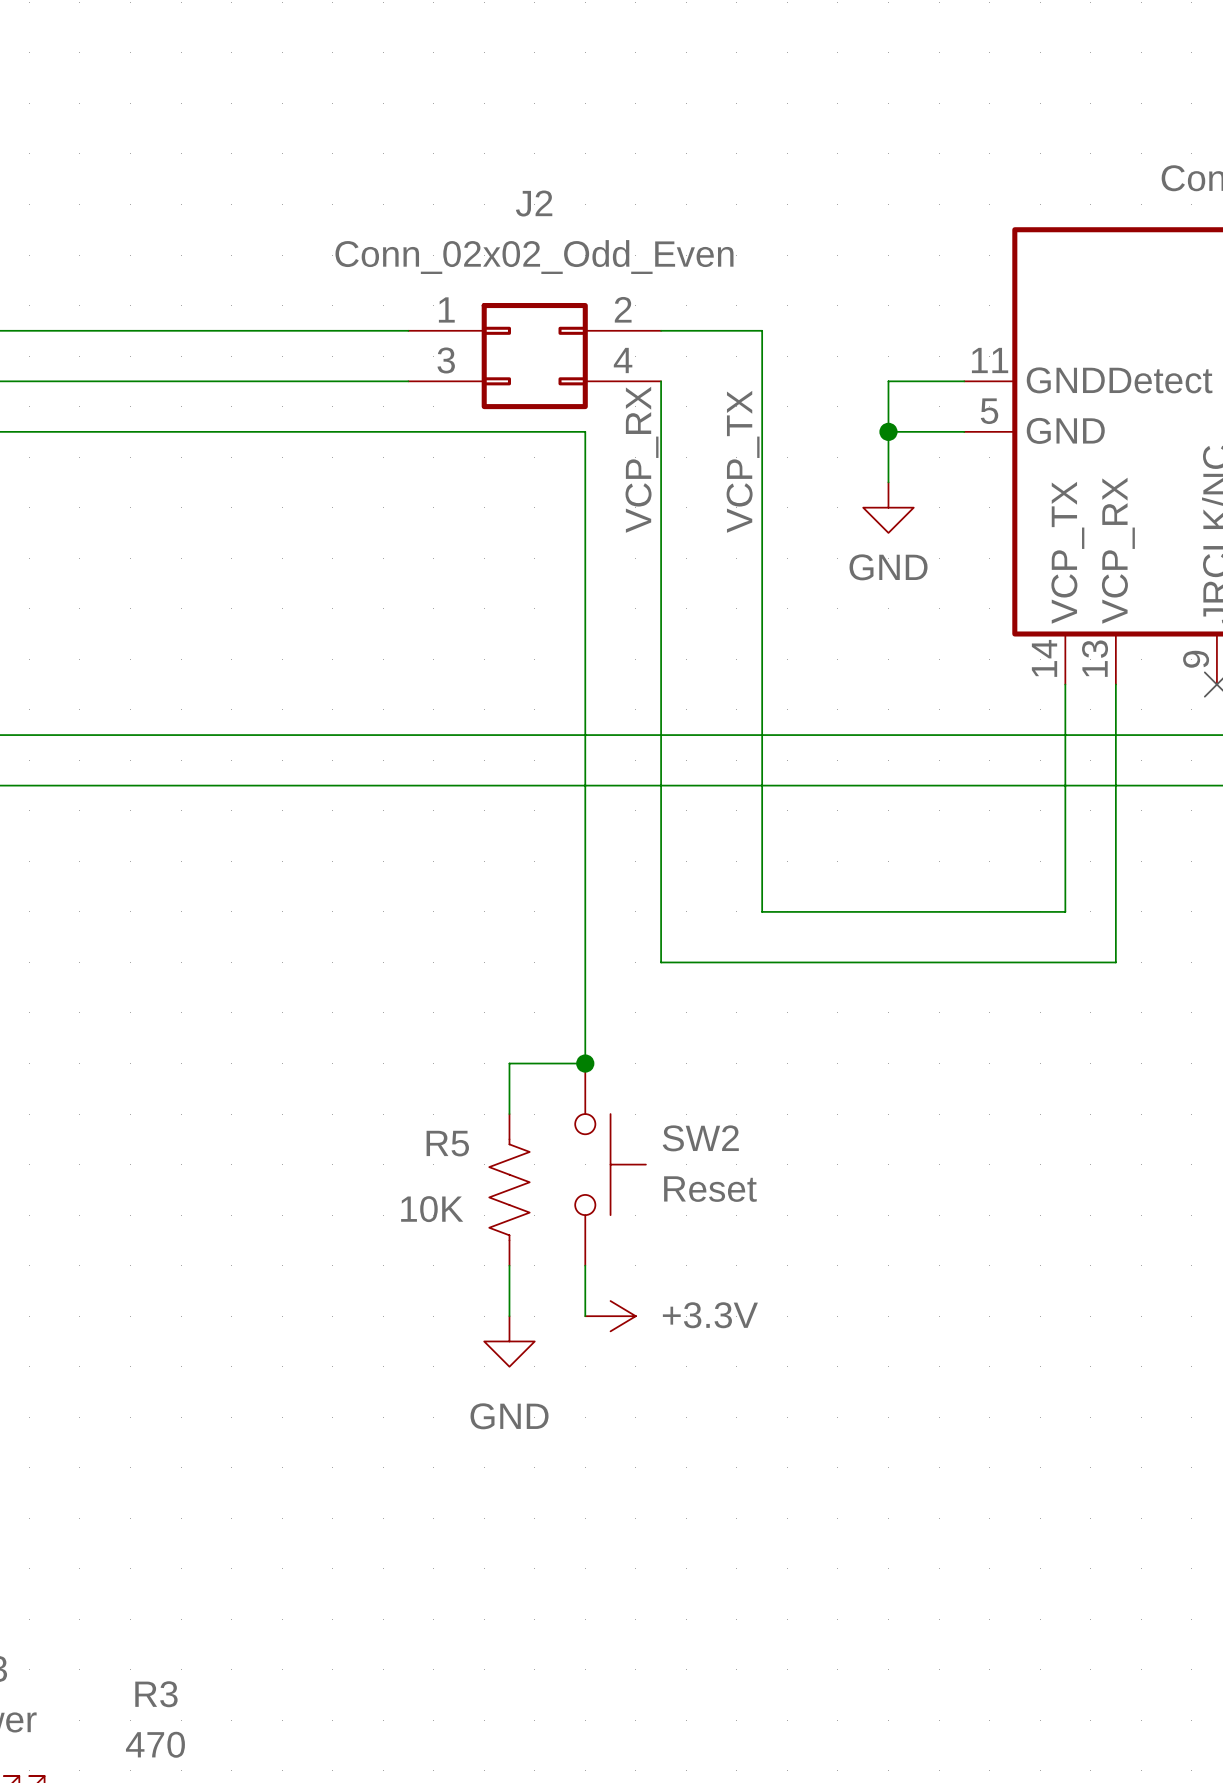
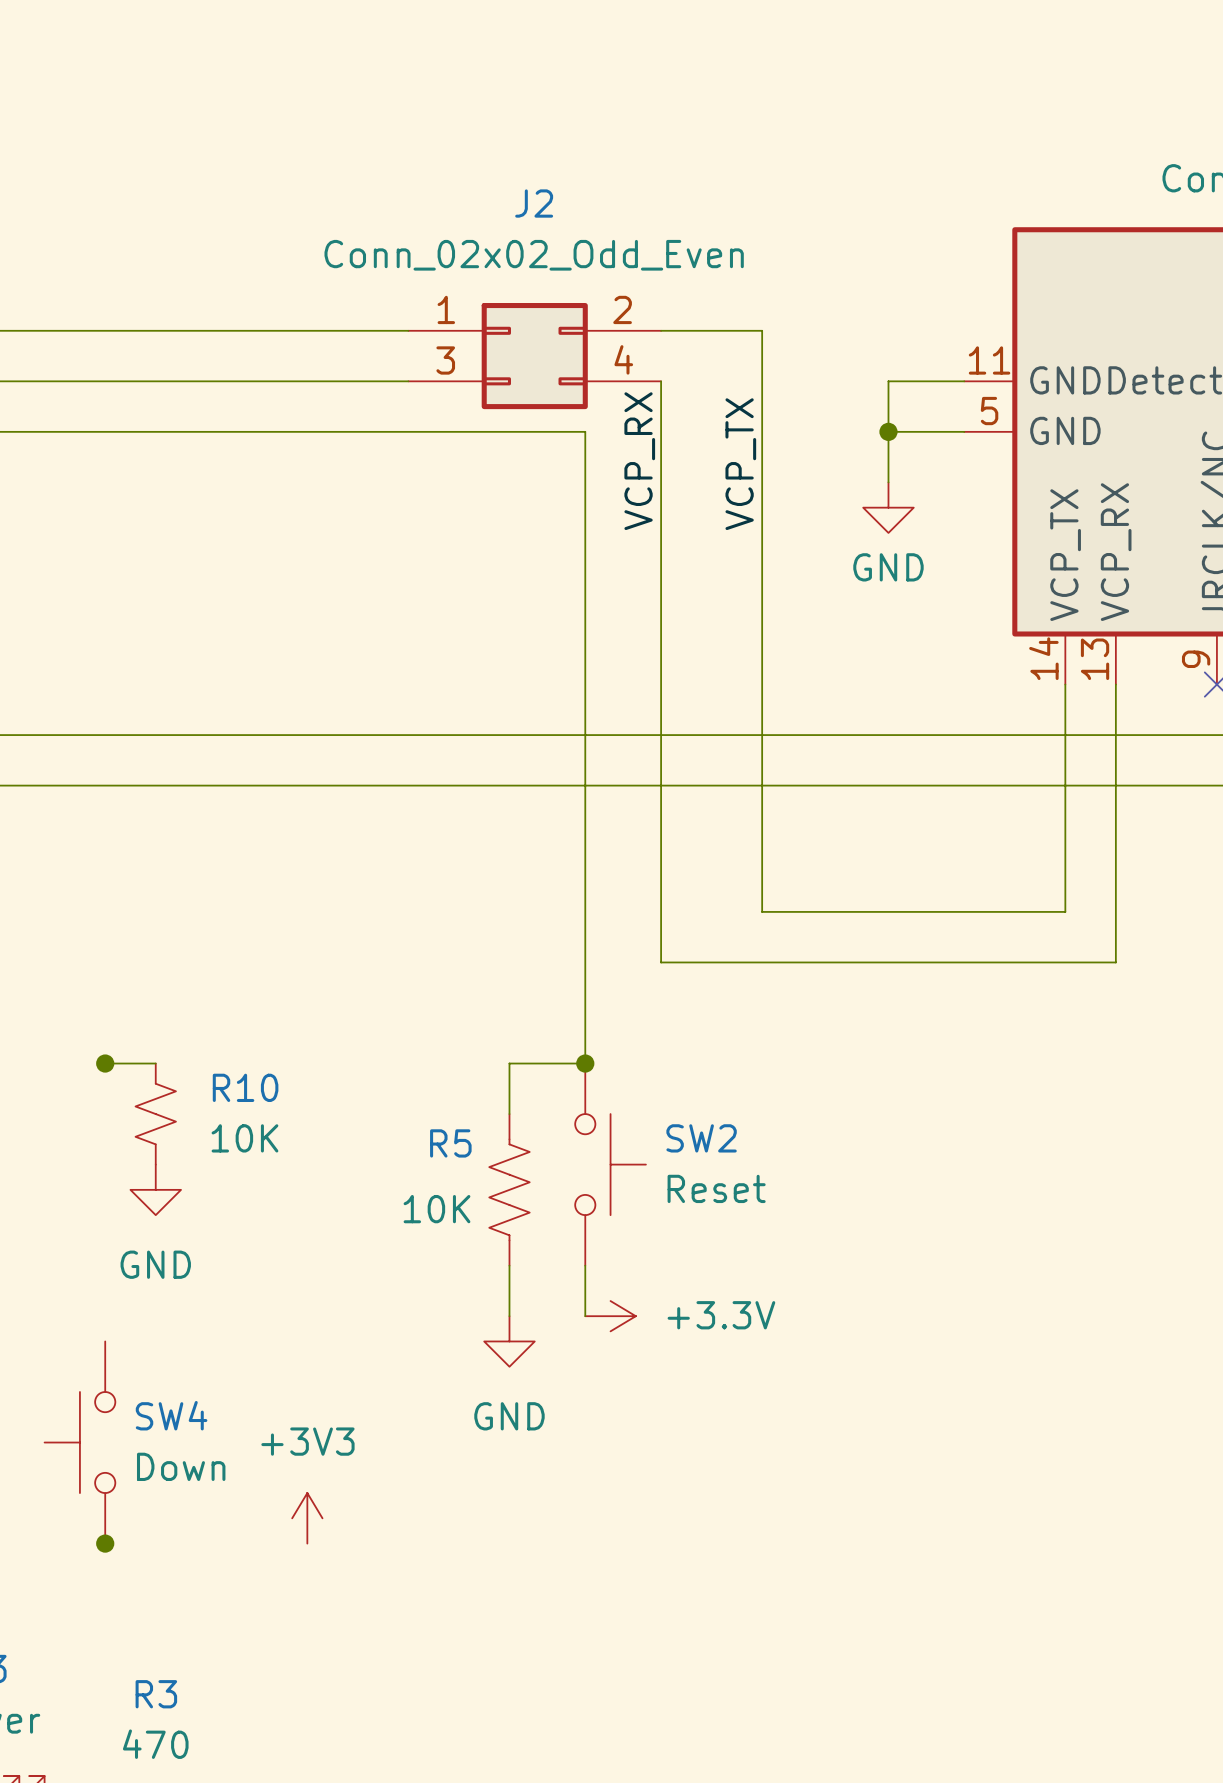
wire: none -> (105, 1063) (155, 1063)
junction: none -> (105, 1063)
R10: none -> 10K (155, 1114)
power symbol: none -> GND (155, 1189)
SW4: none -> Down (79, 1442)
power symbol: none -> +3V3 (307, 1518)
junction: none -> (105, 1543)

